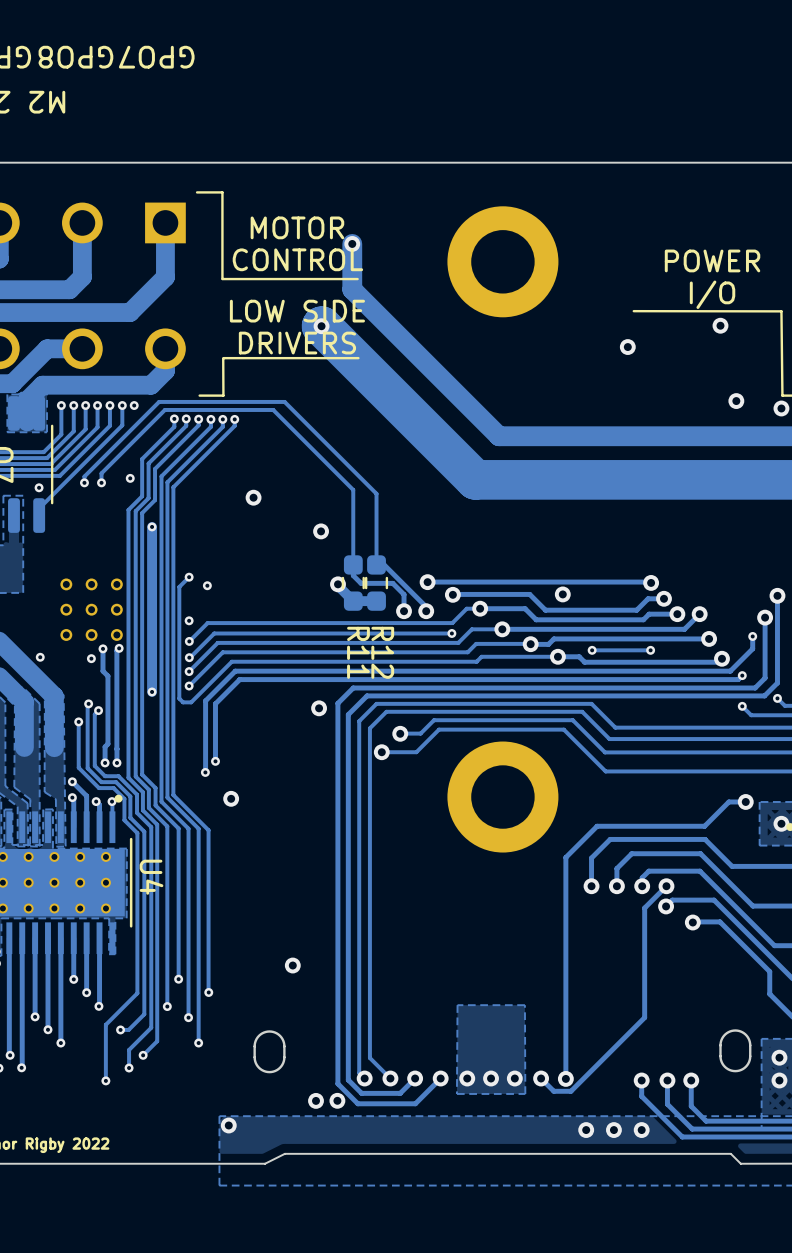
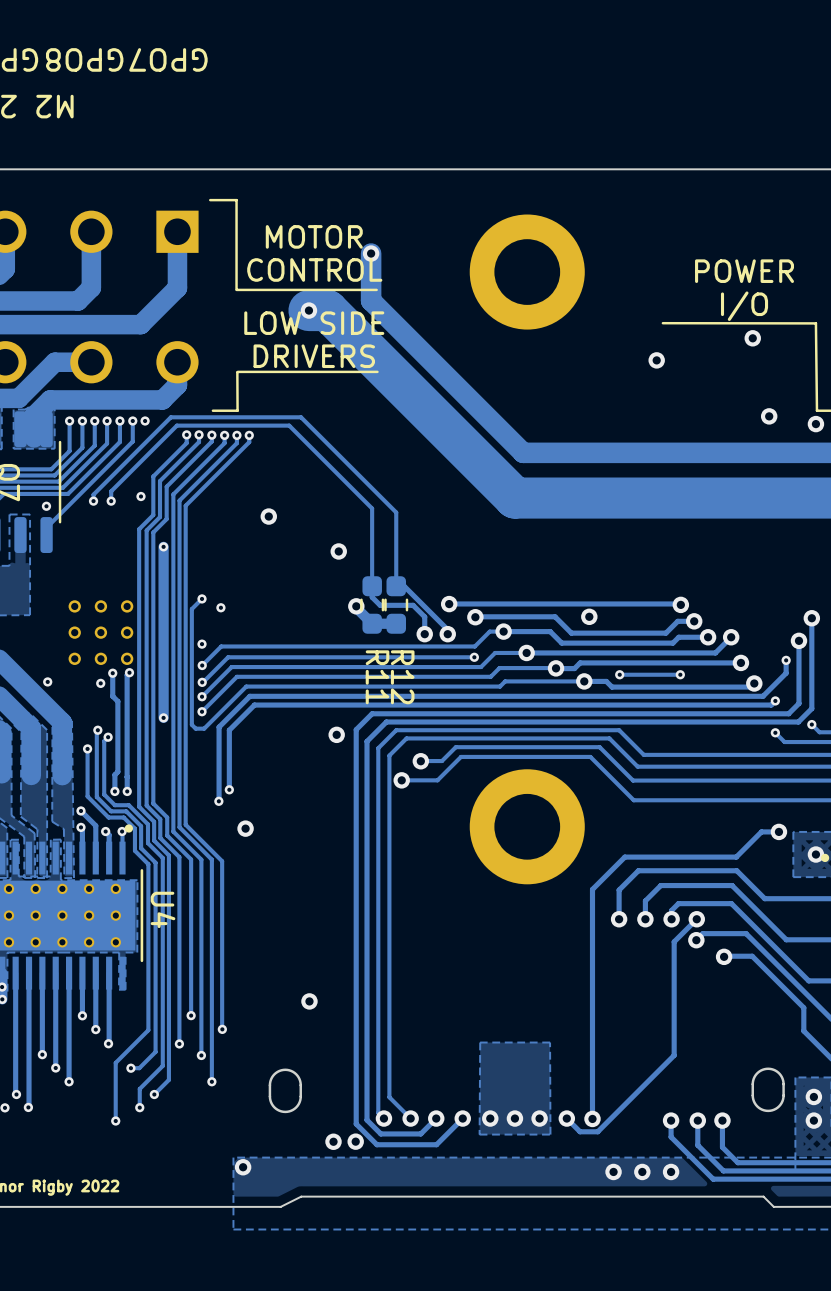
track: (321, 326) (475, 479) (491, 479) -> (308, 310) (327, 310) (514, 498)
via position: (321, 326) -> (308, 310)

